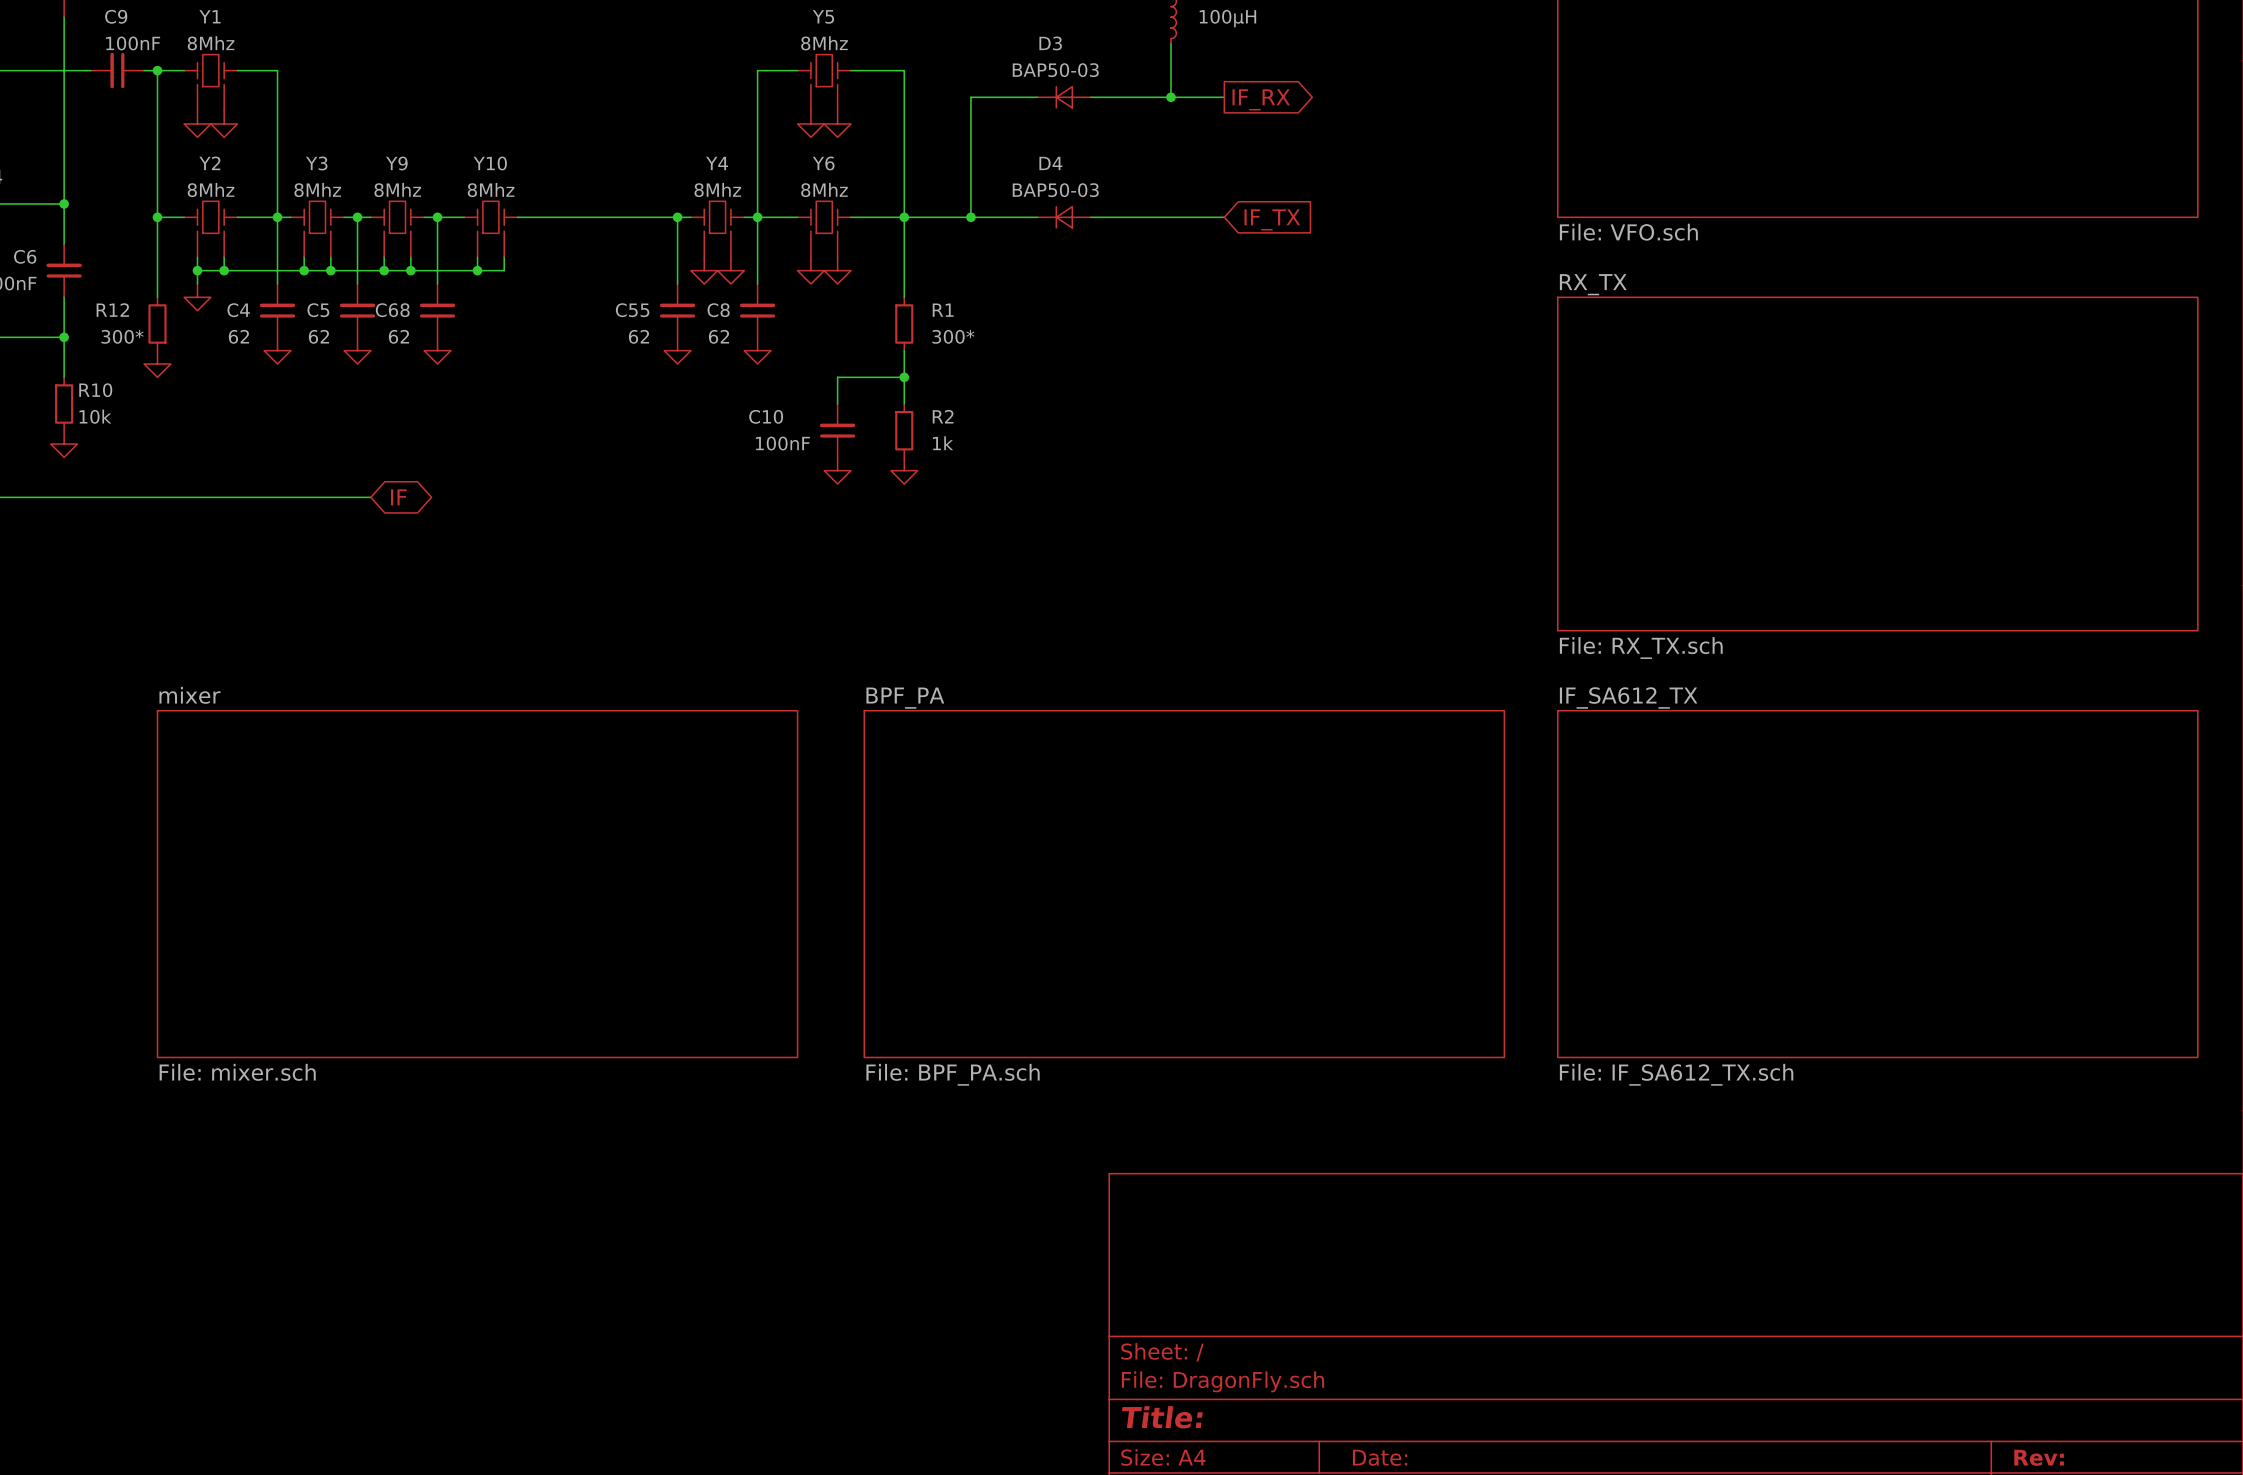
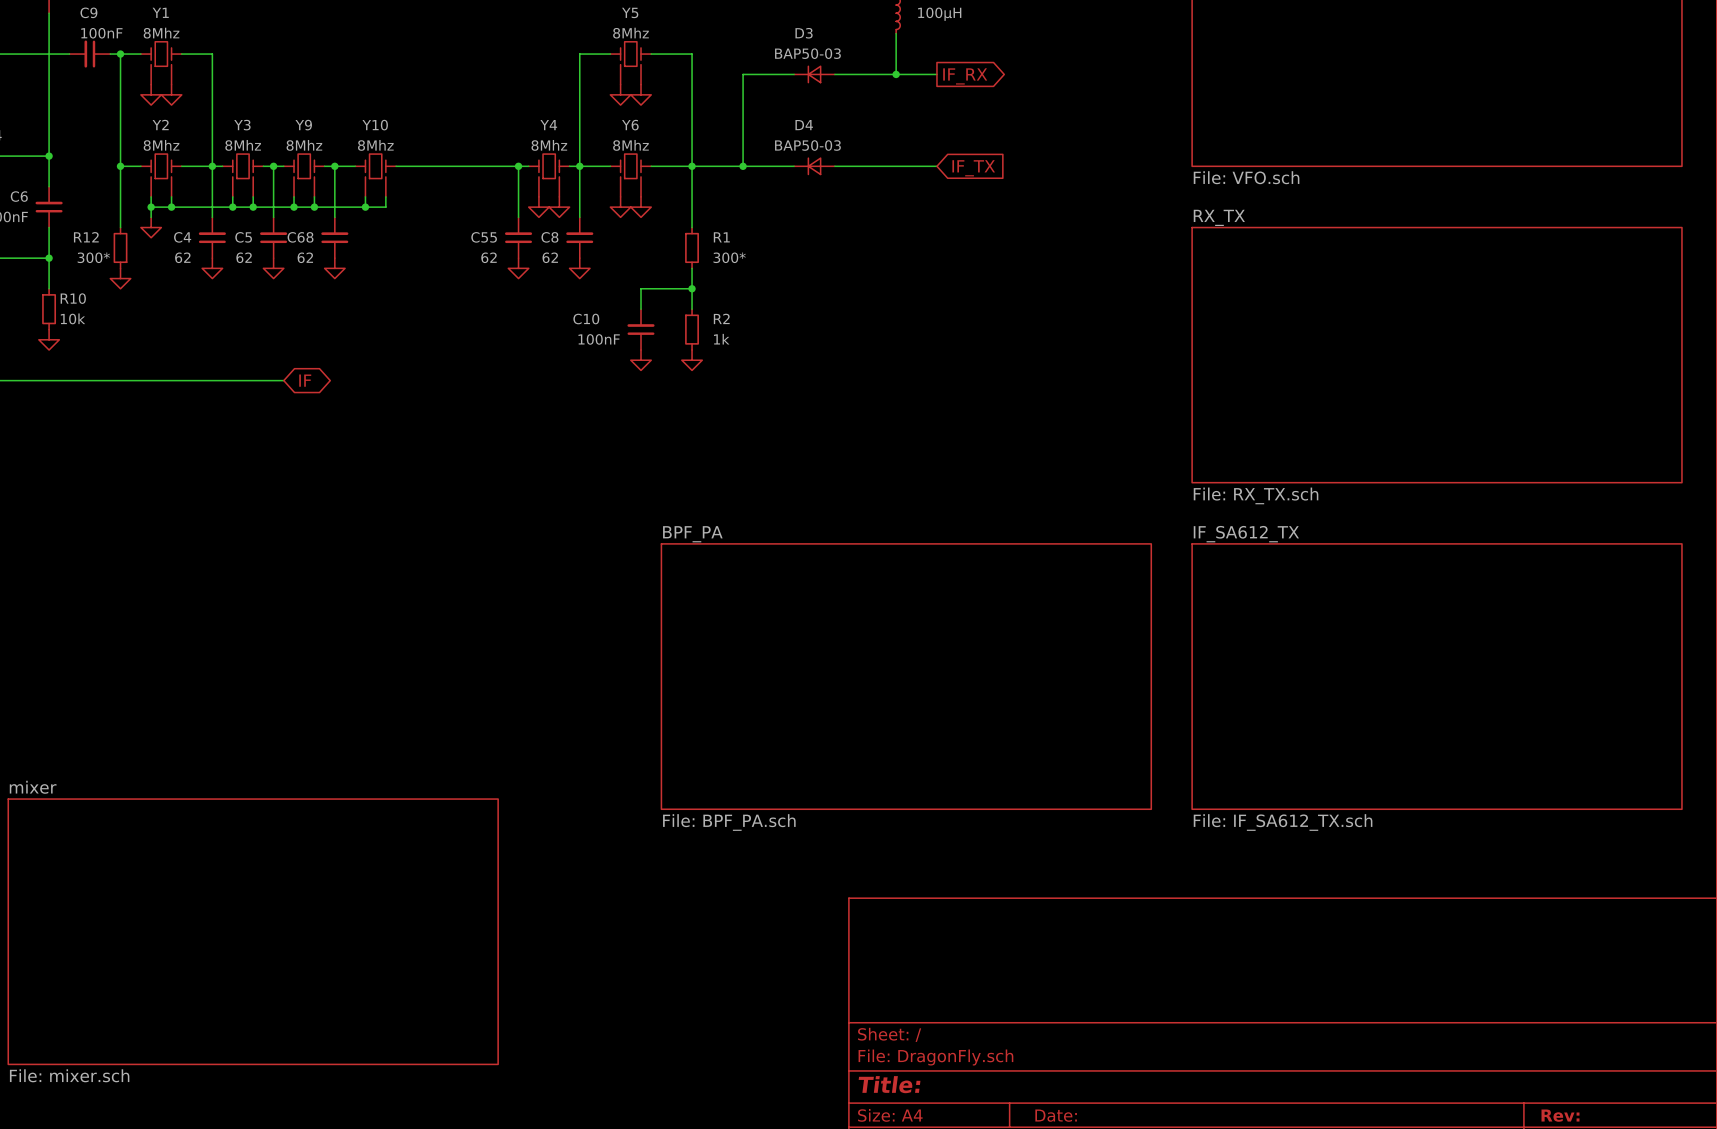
sheet mixer: File: mixer.sch (477, 884) -> none
sheet mixer: none -> File: mixer.sch (253, 931)

